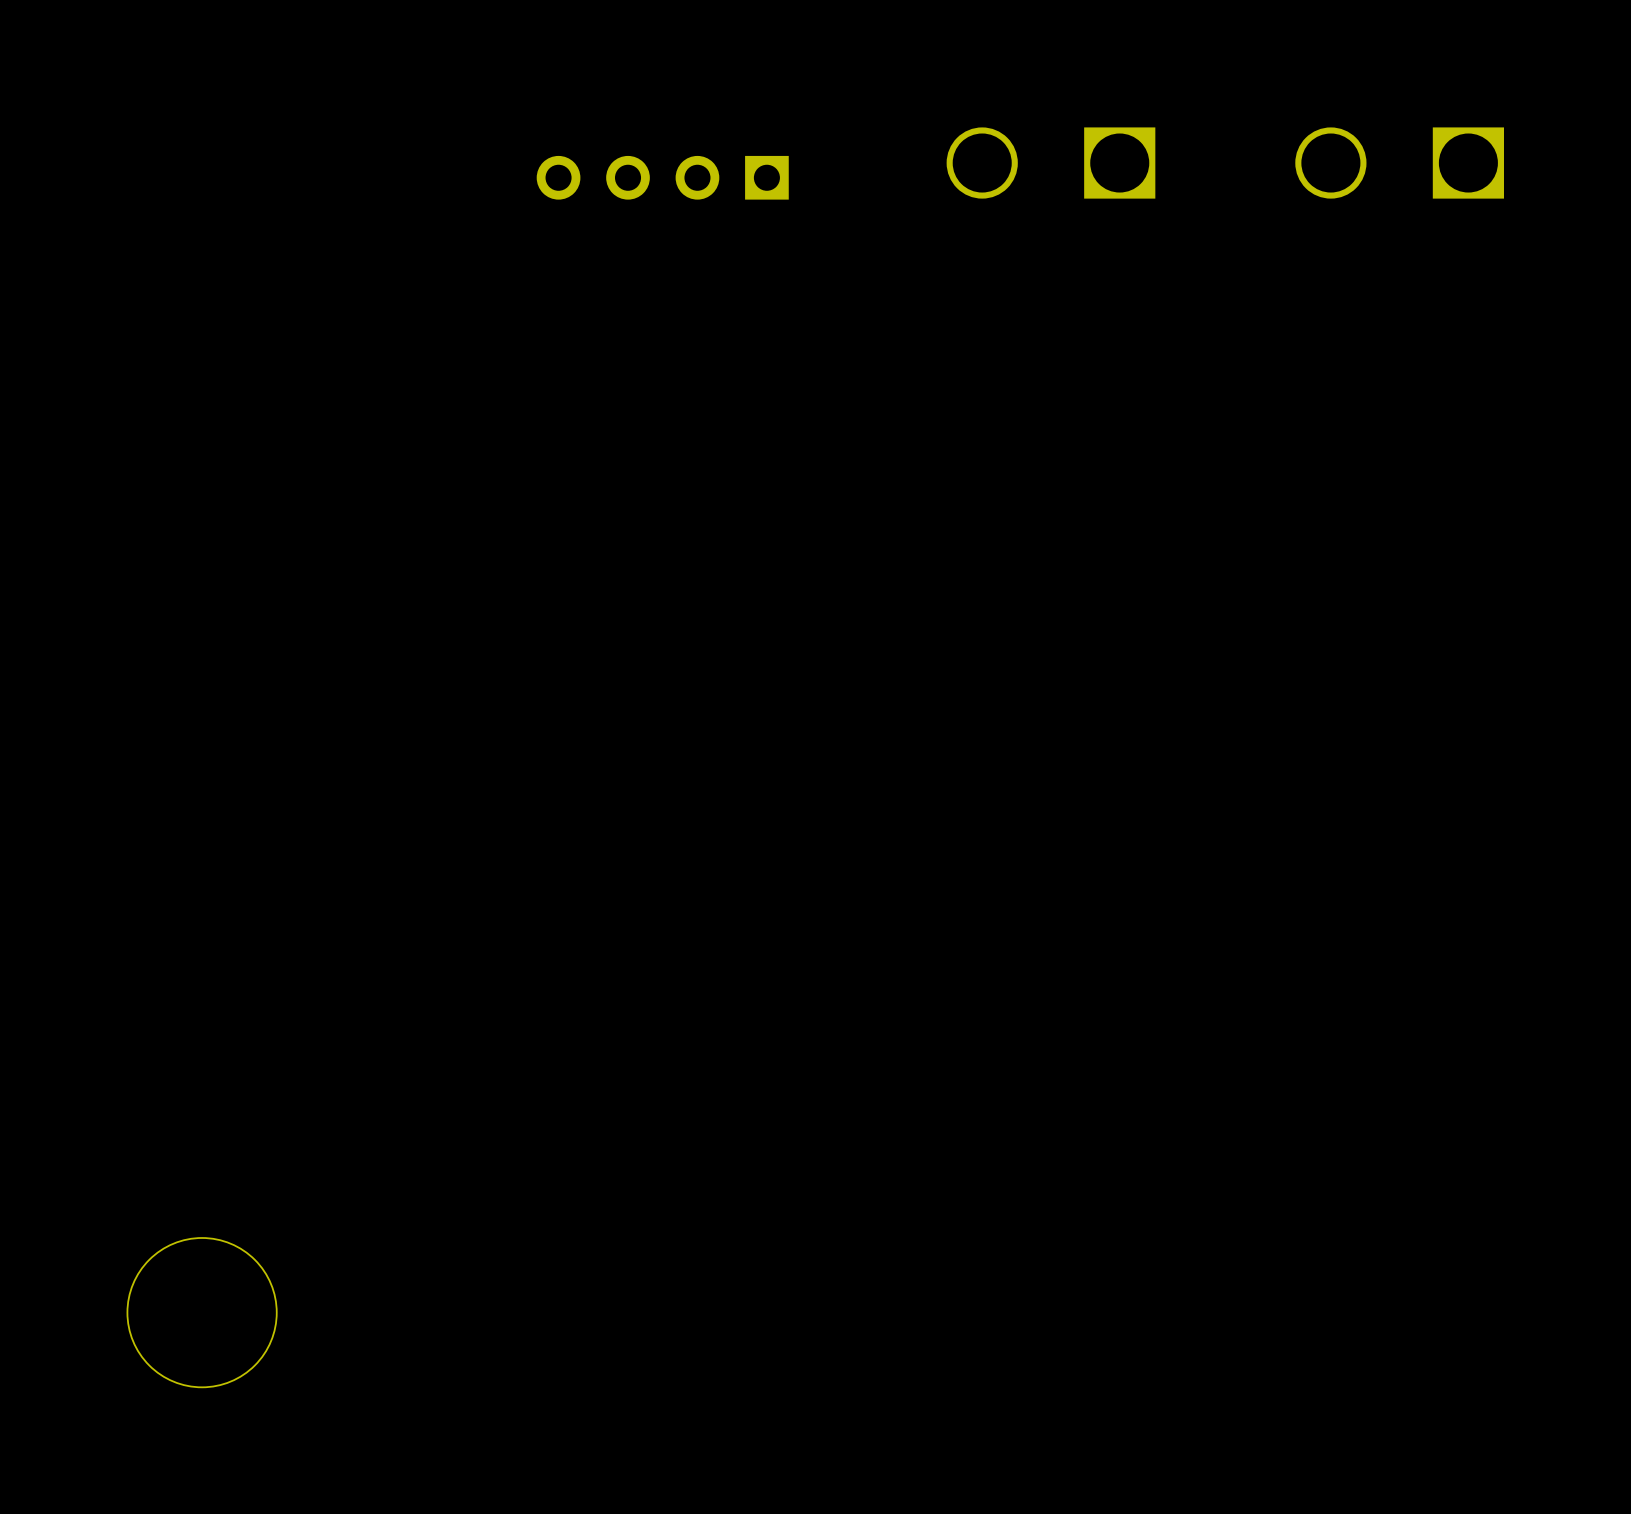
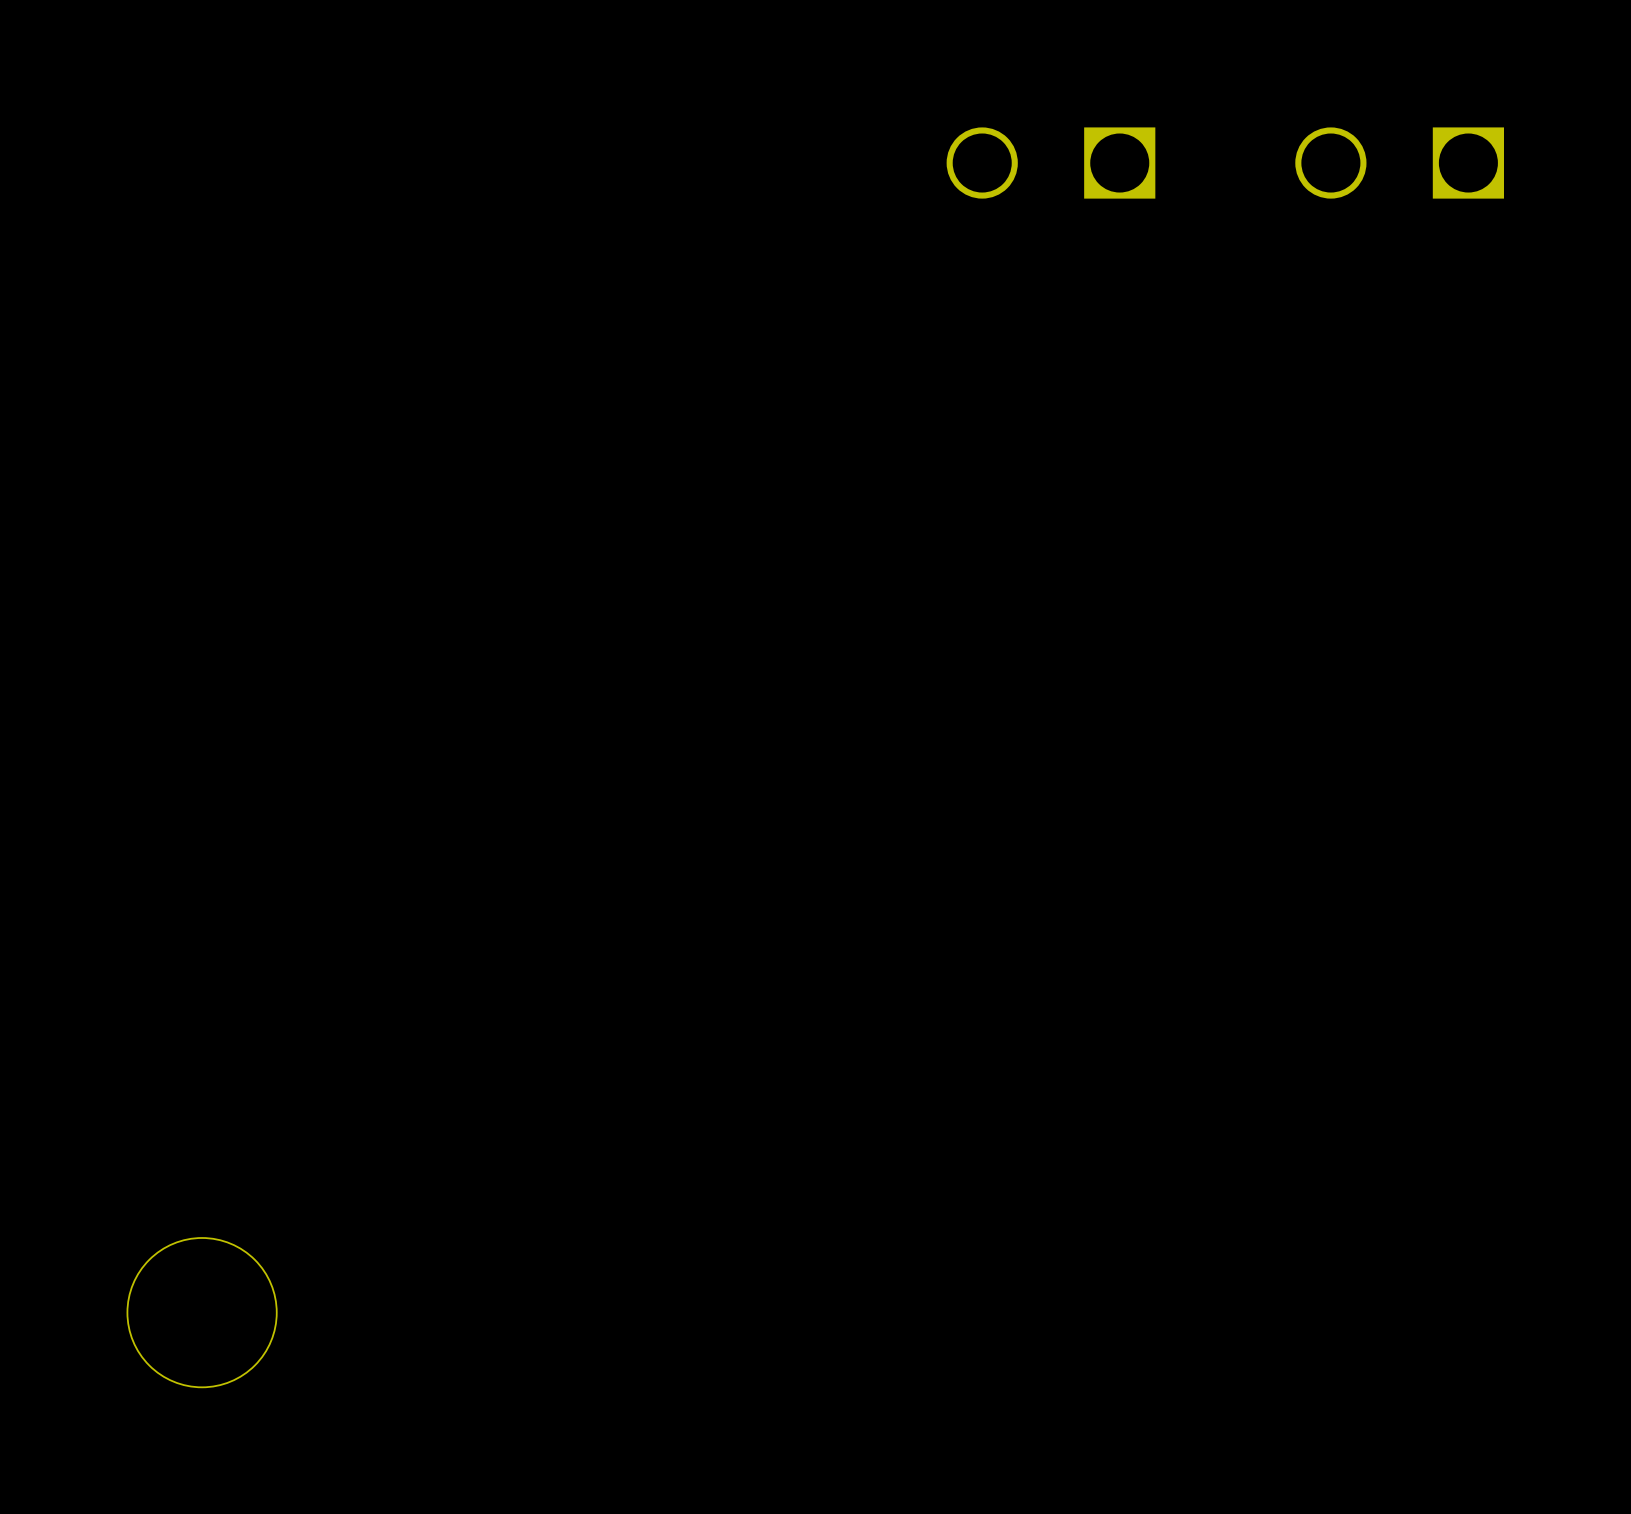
part: (662, 177) -> none

